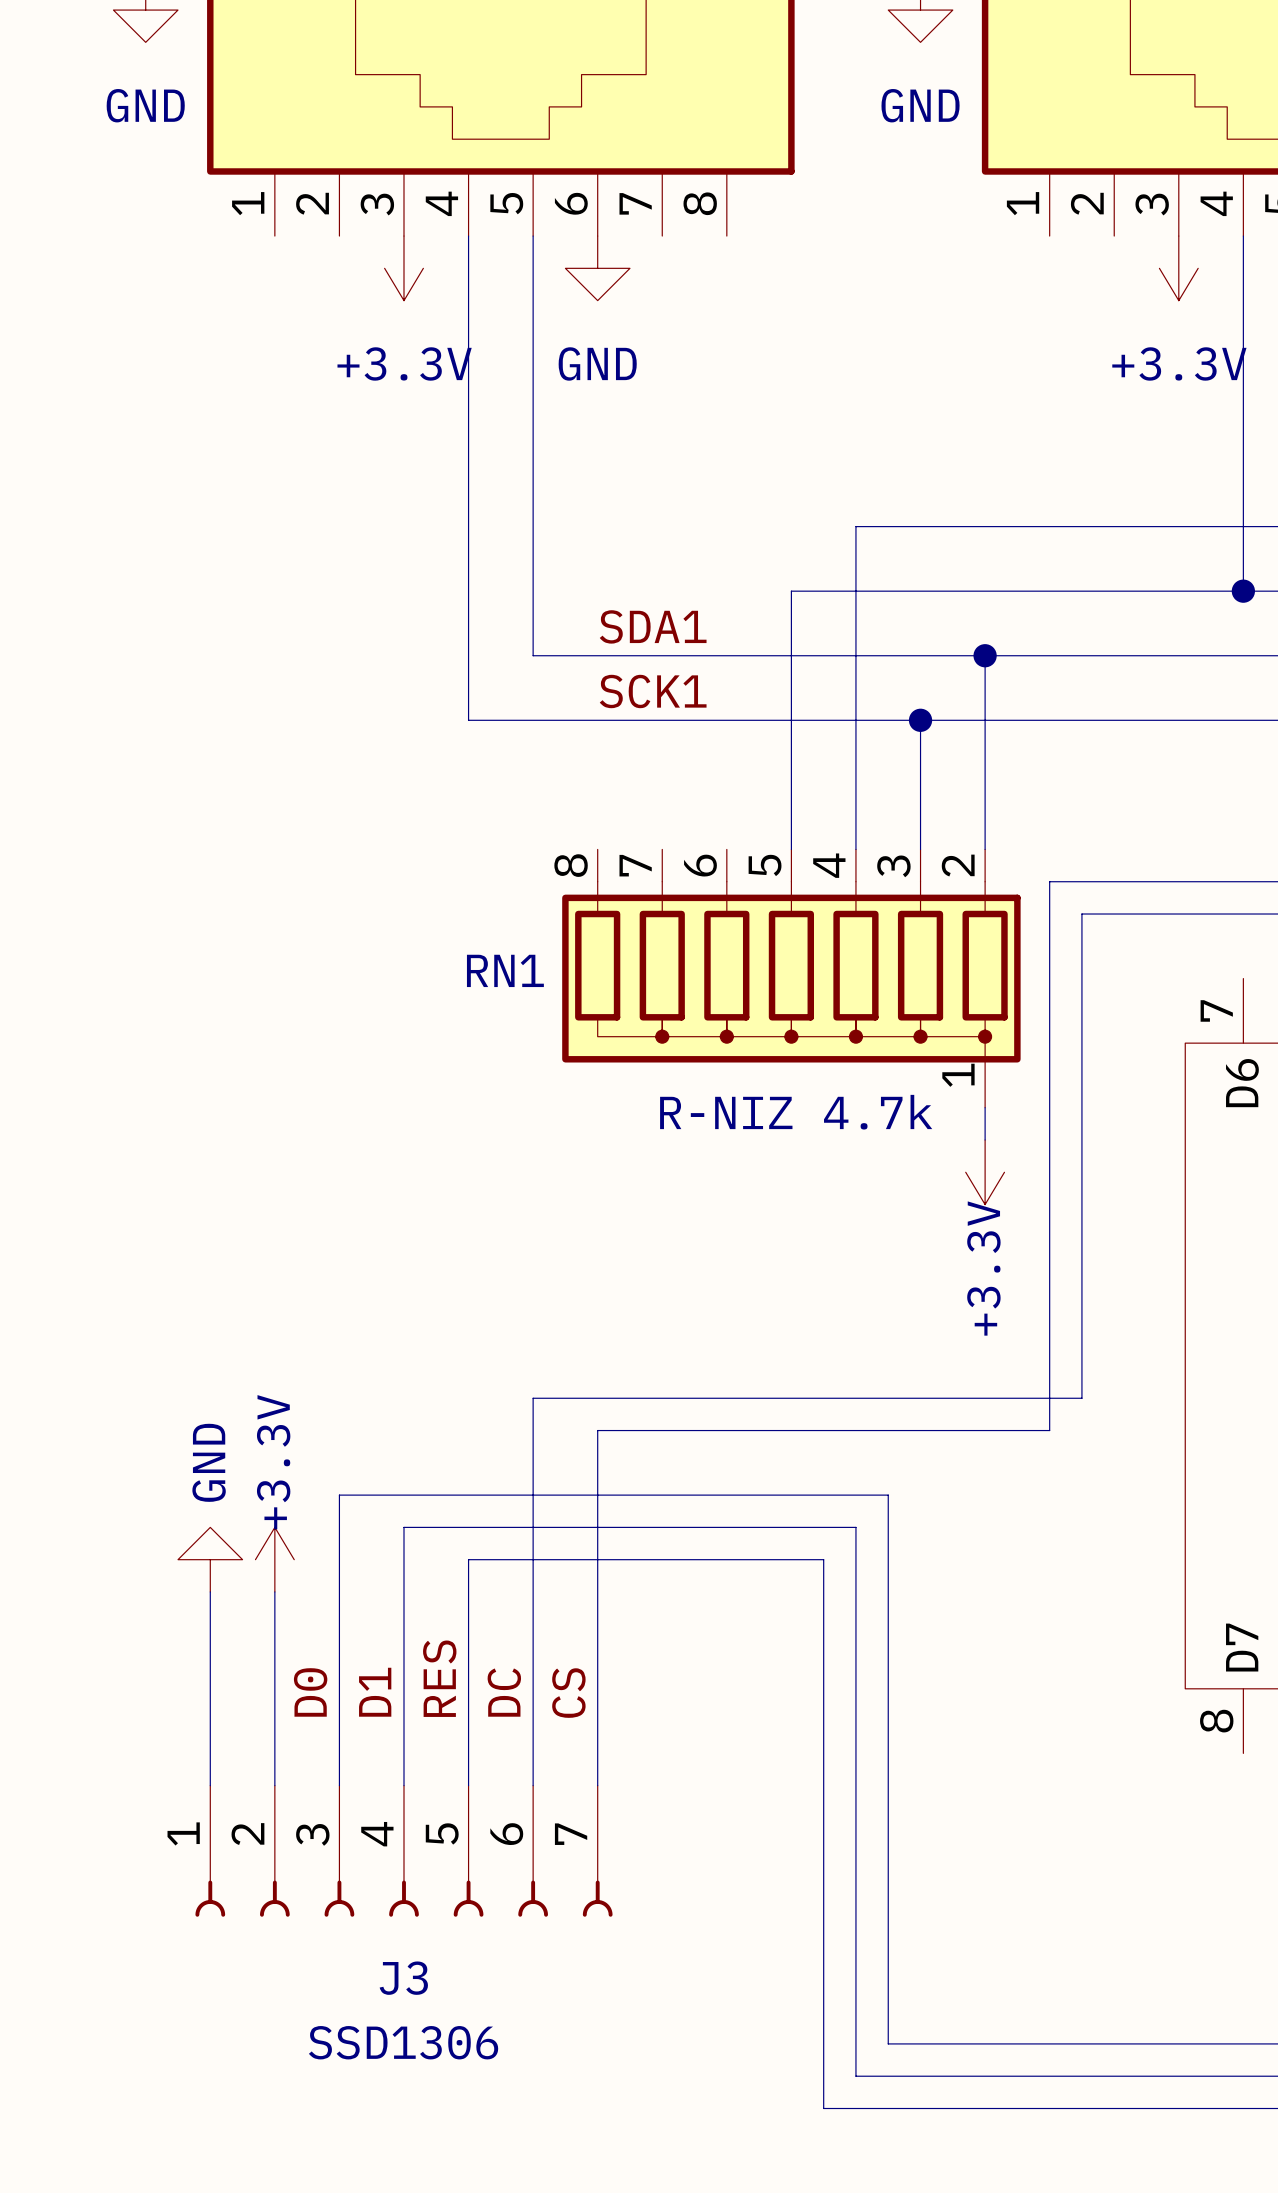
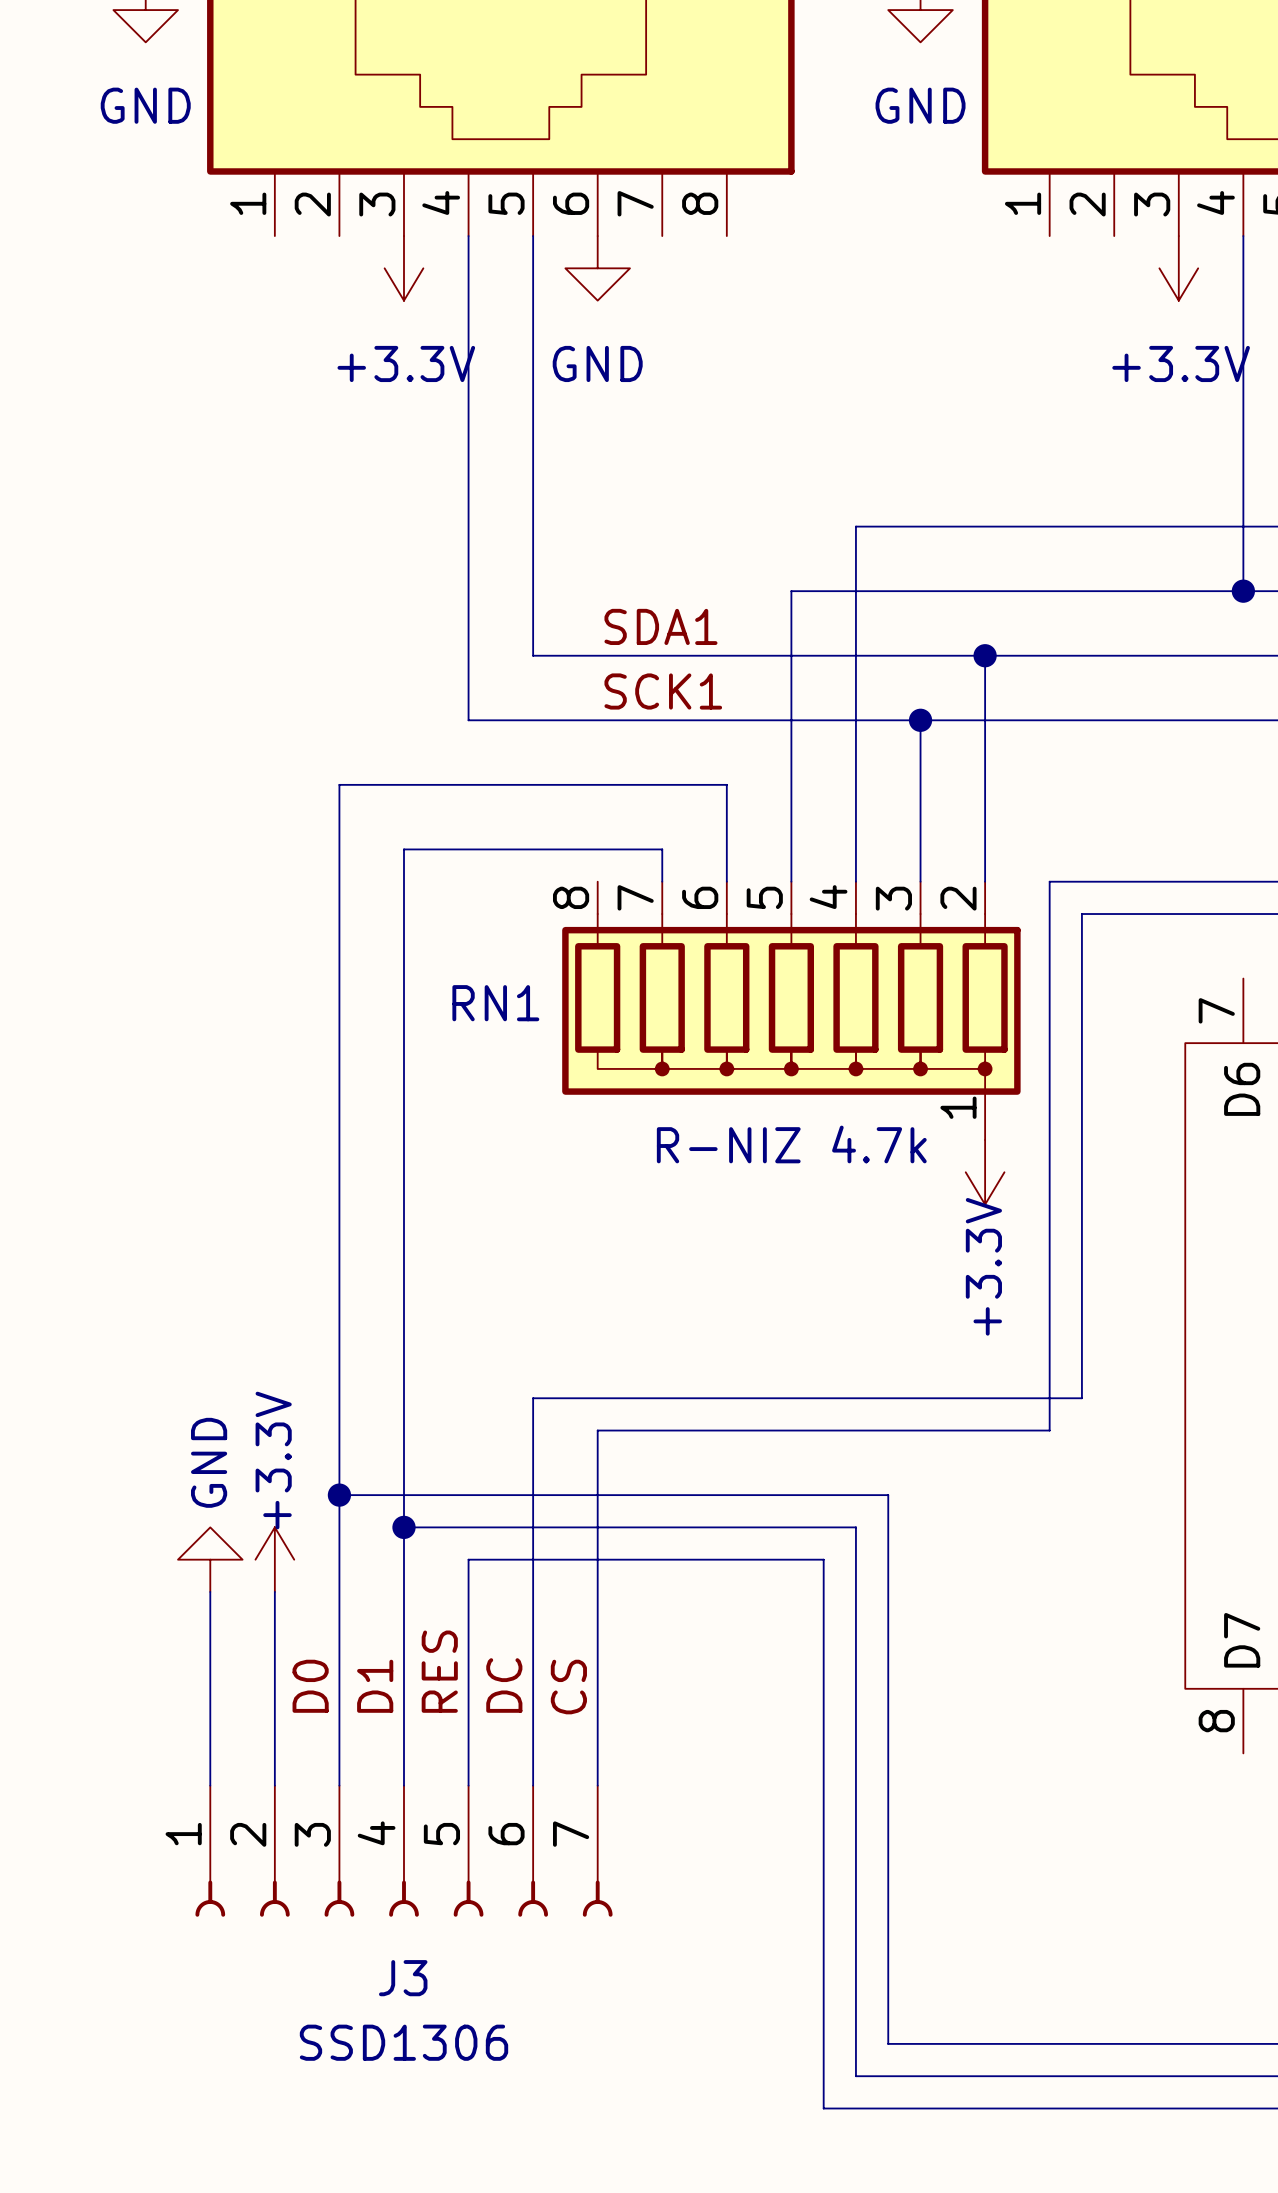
wire: none -> (662, 881) (662, 849) (403, 849) (403, 1527)
wire: none -> (726, 881) (726, 784) (339, 784) (339, 1495)
RN1 position: (791, 978) -> (791, 1010)
junction: none -> (339, 1495)
junction: none -> (403, 1527)

